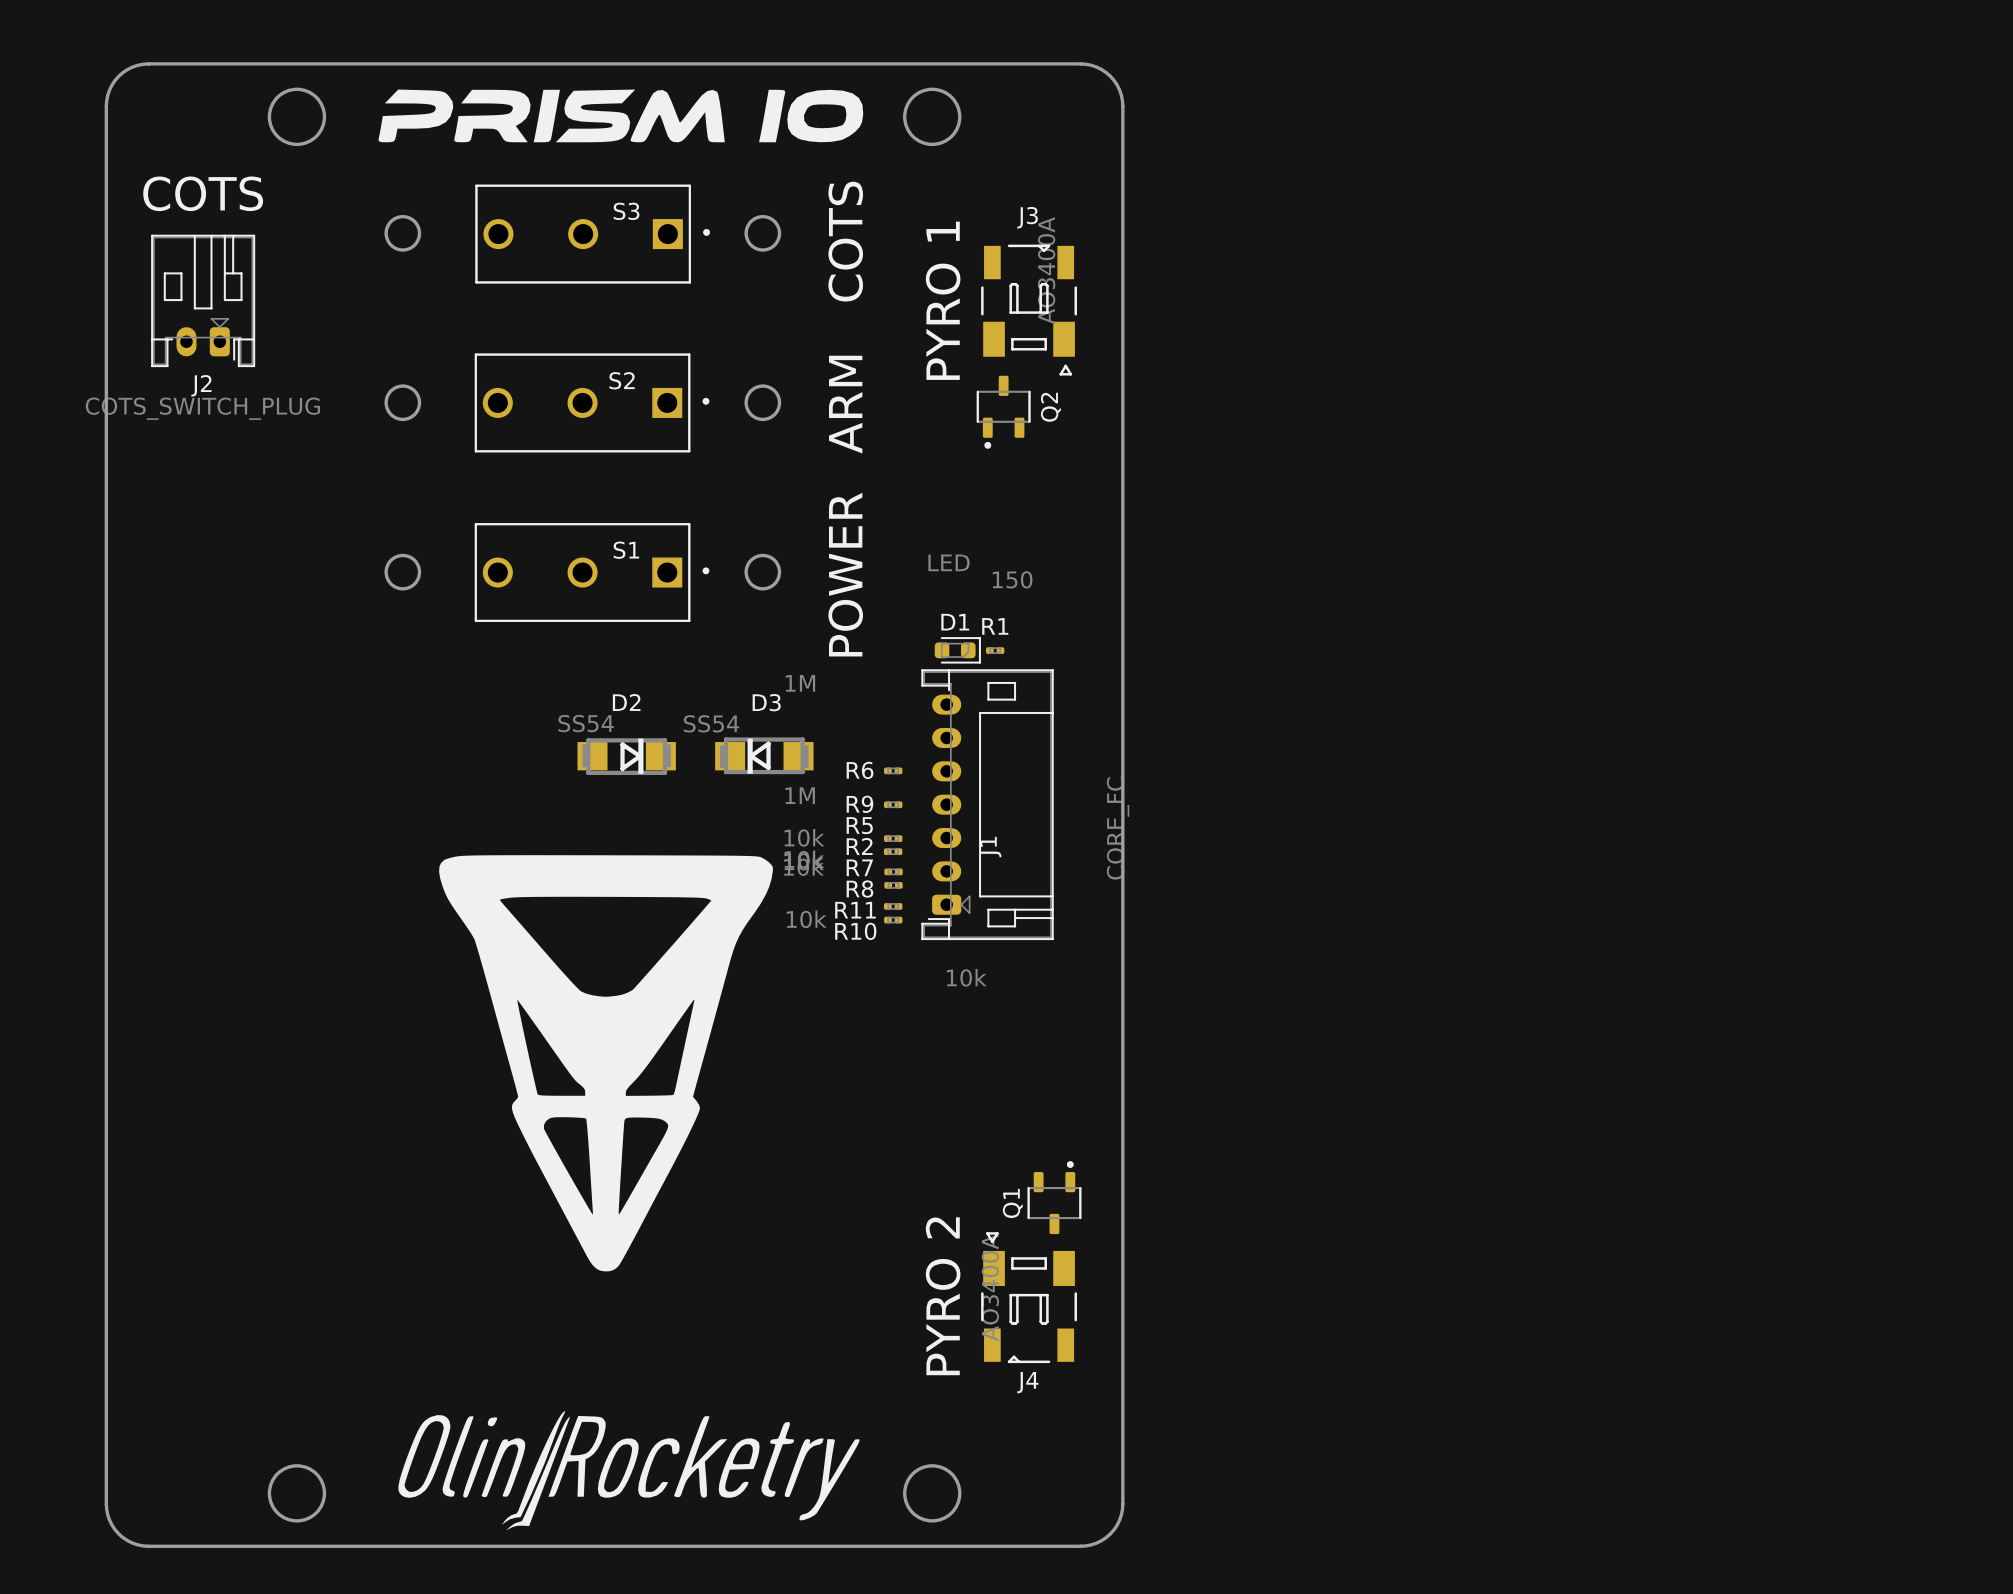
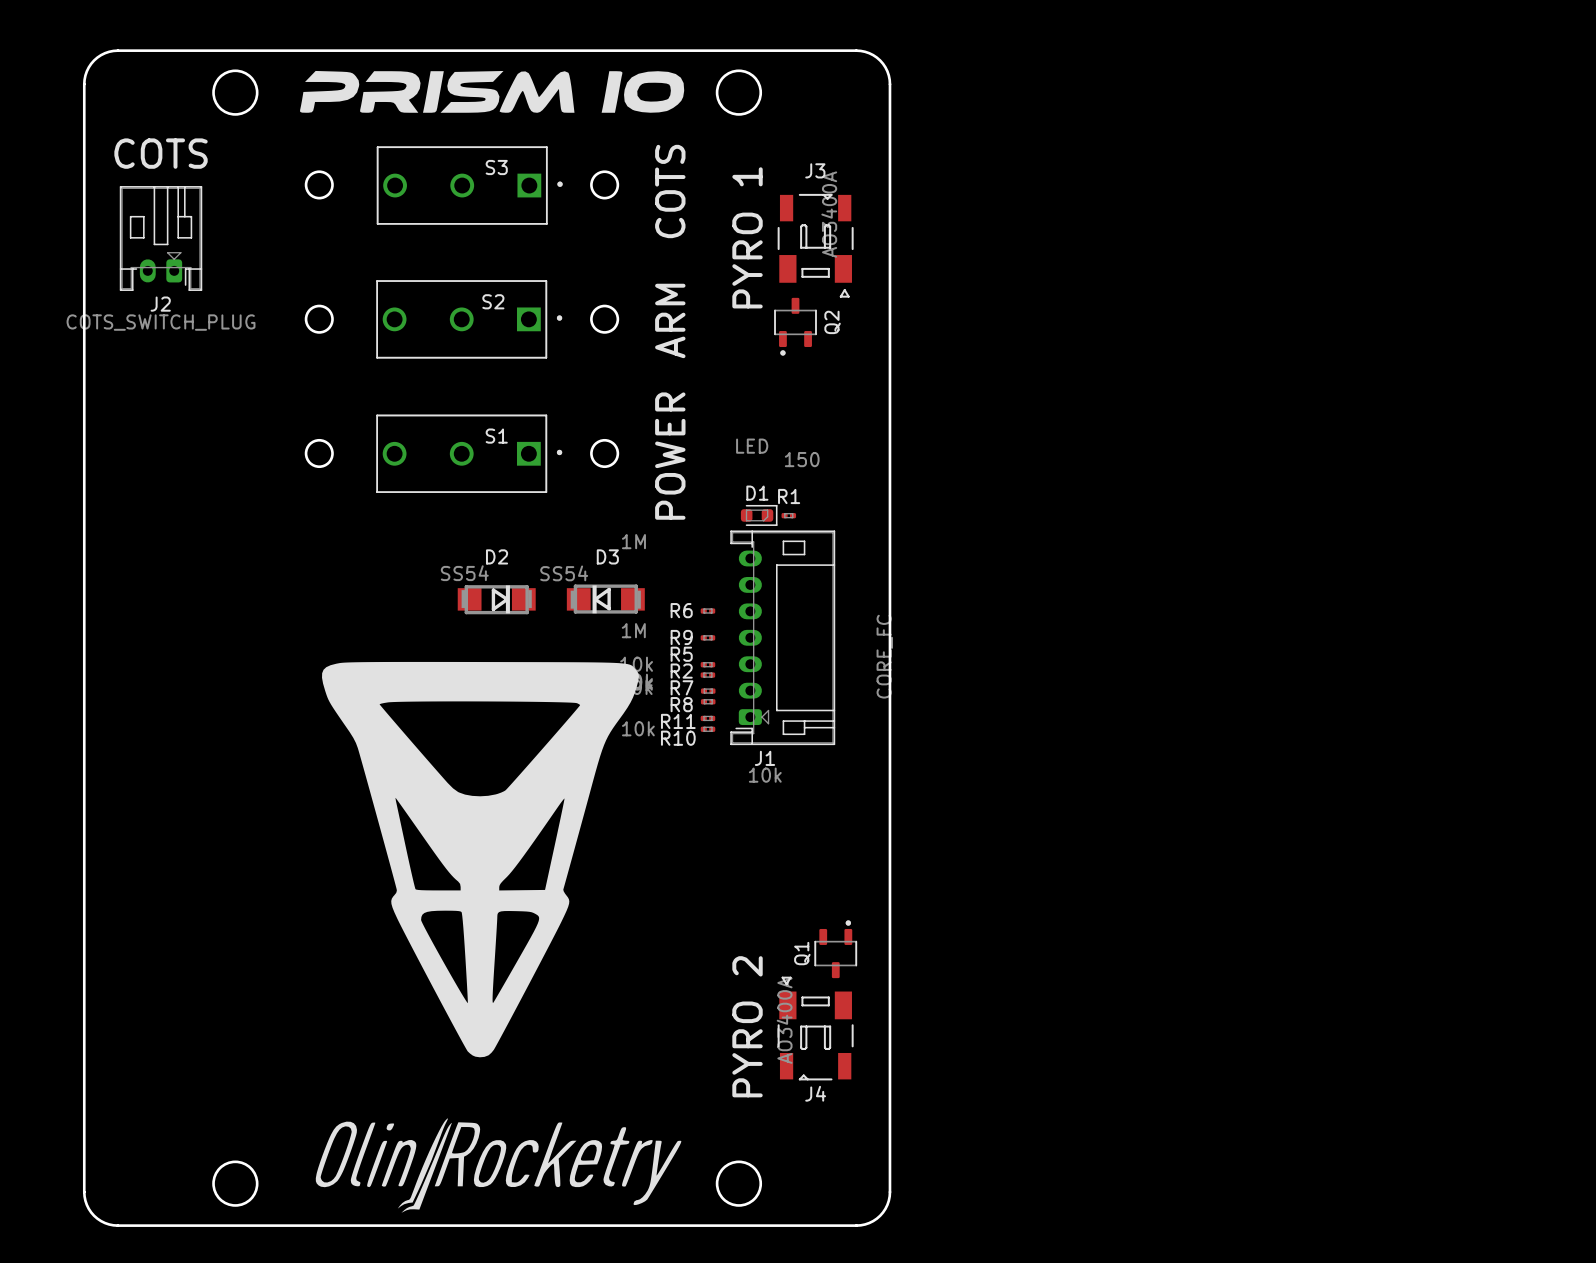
J1 name rotation: 0° (990, 847) -> 90° clockwise (764, 758)
J1 name position: J1 (990, 847) -> J1 (764, 758)
drawing: [439, 855, 773, 1272] -> none
part: none -> (480, 859)

